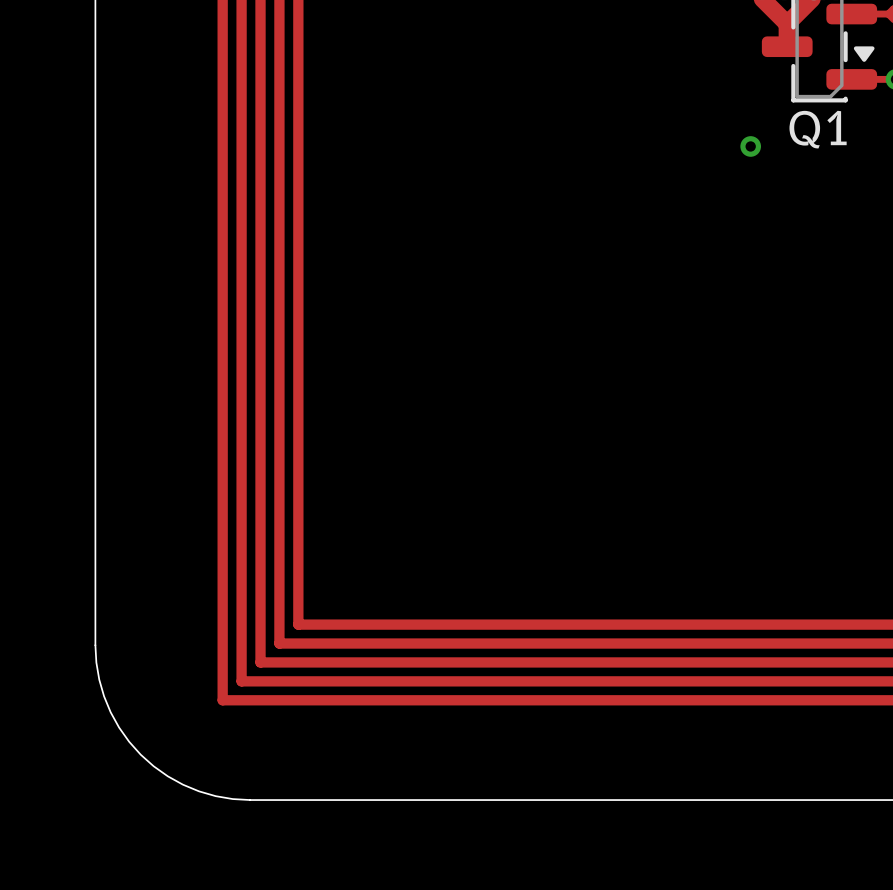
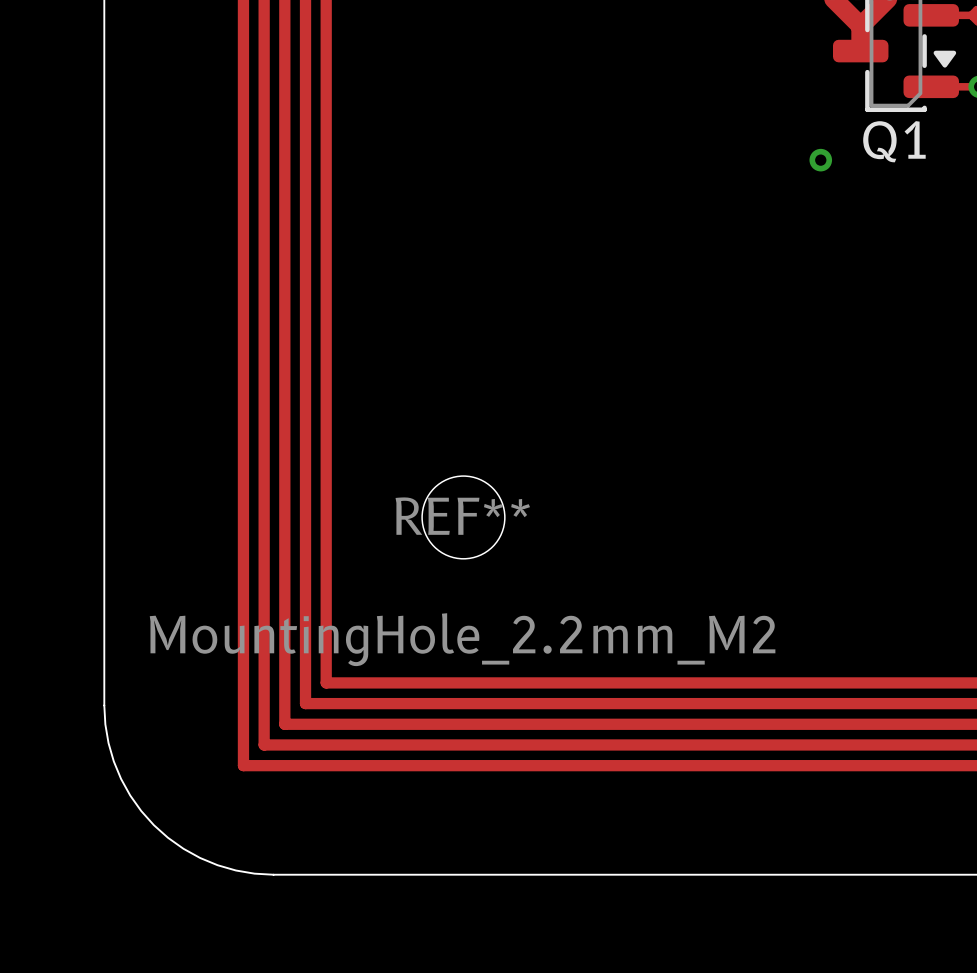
REF**: none -> MountingHole_2.2mm_M2 (463, 517)

